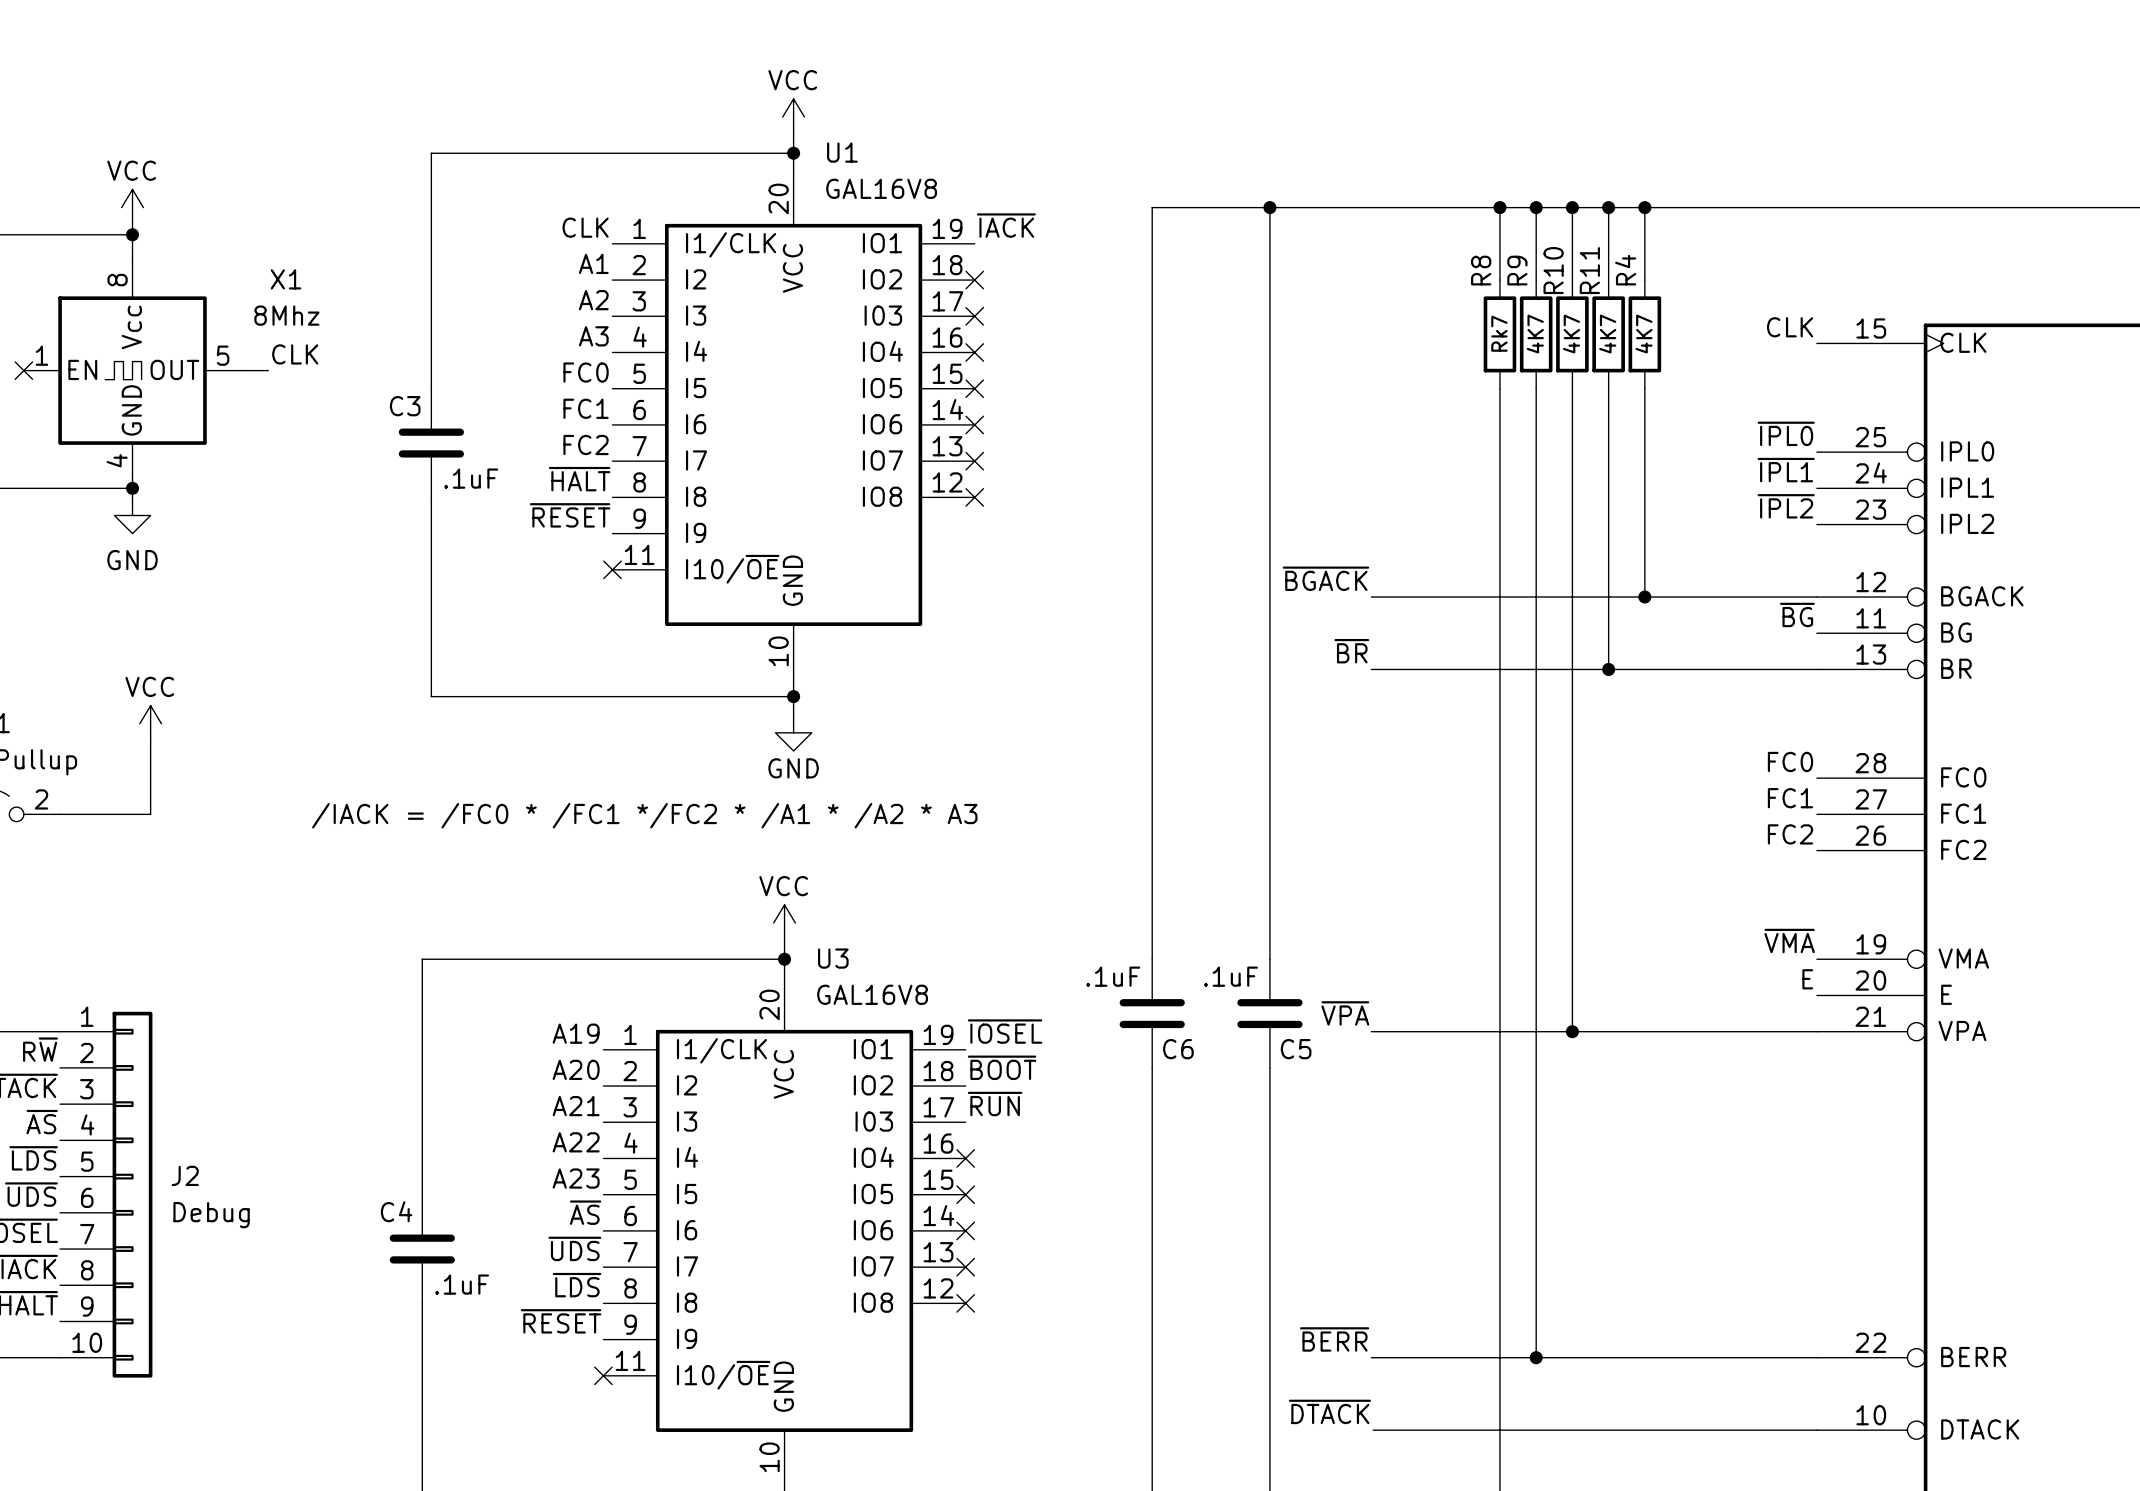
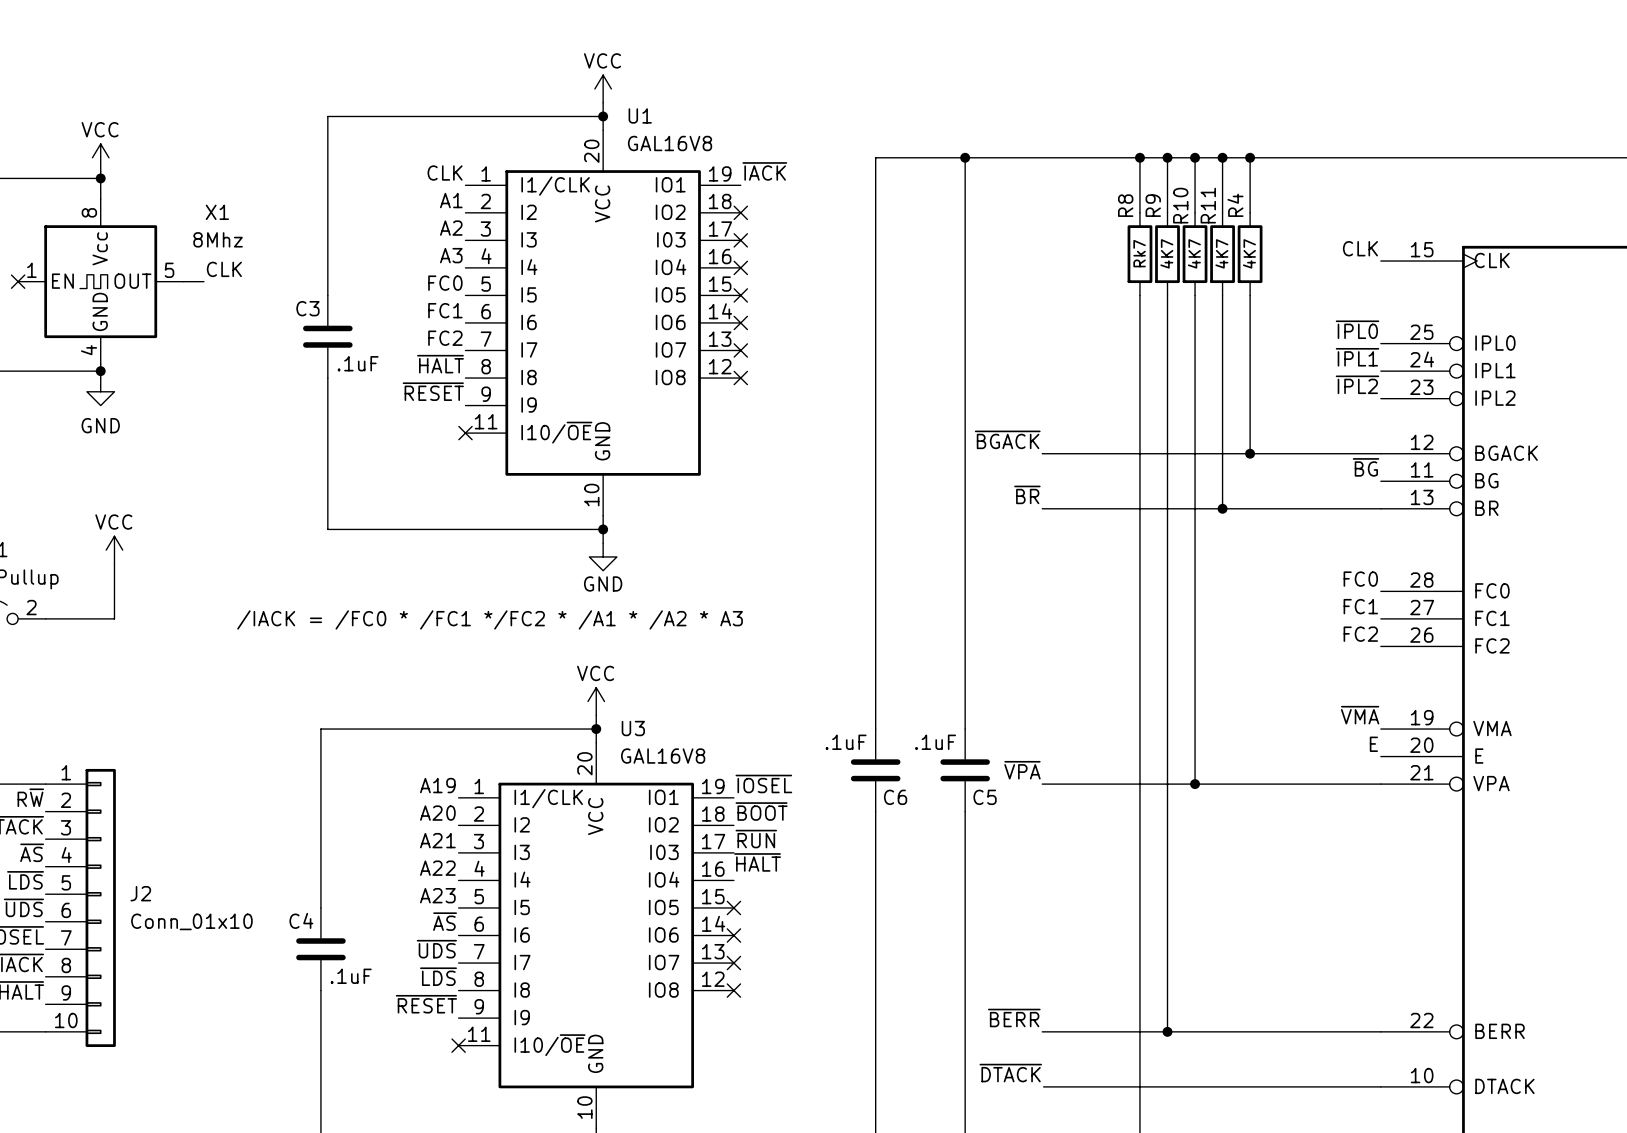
label: none -> ~{HALT} (757, 862)
no-connect mark: (965, 1158) -> none
J2 value: Debug (211, 1215) -> Conn_01x10 (191, 921)

